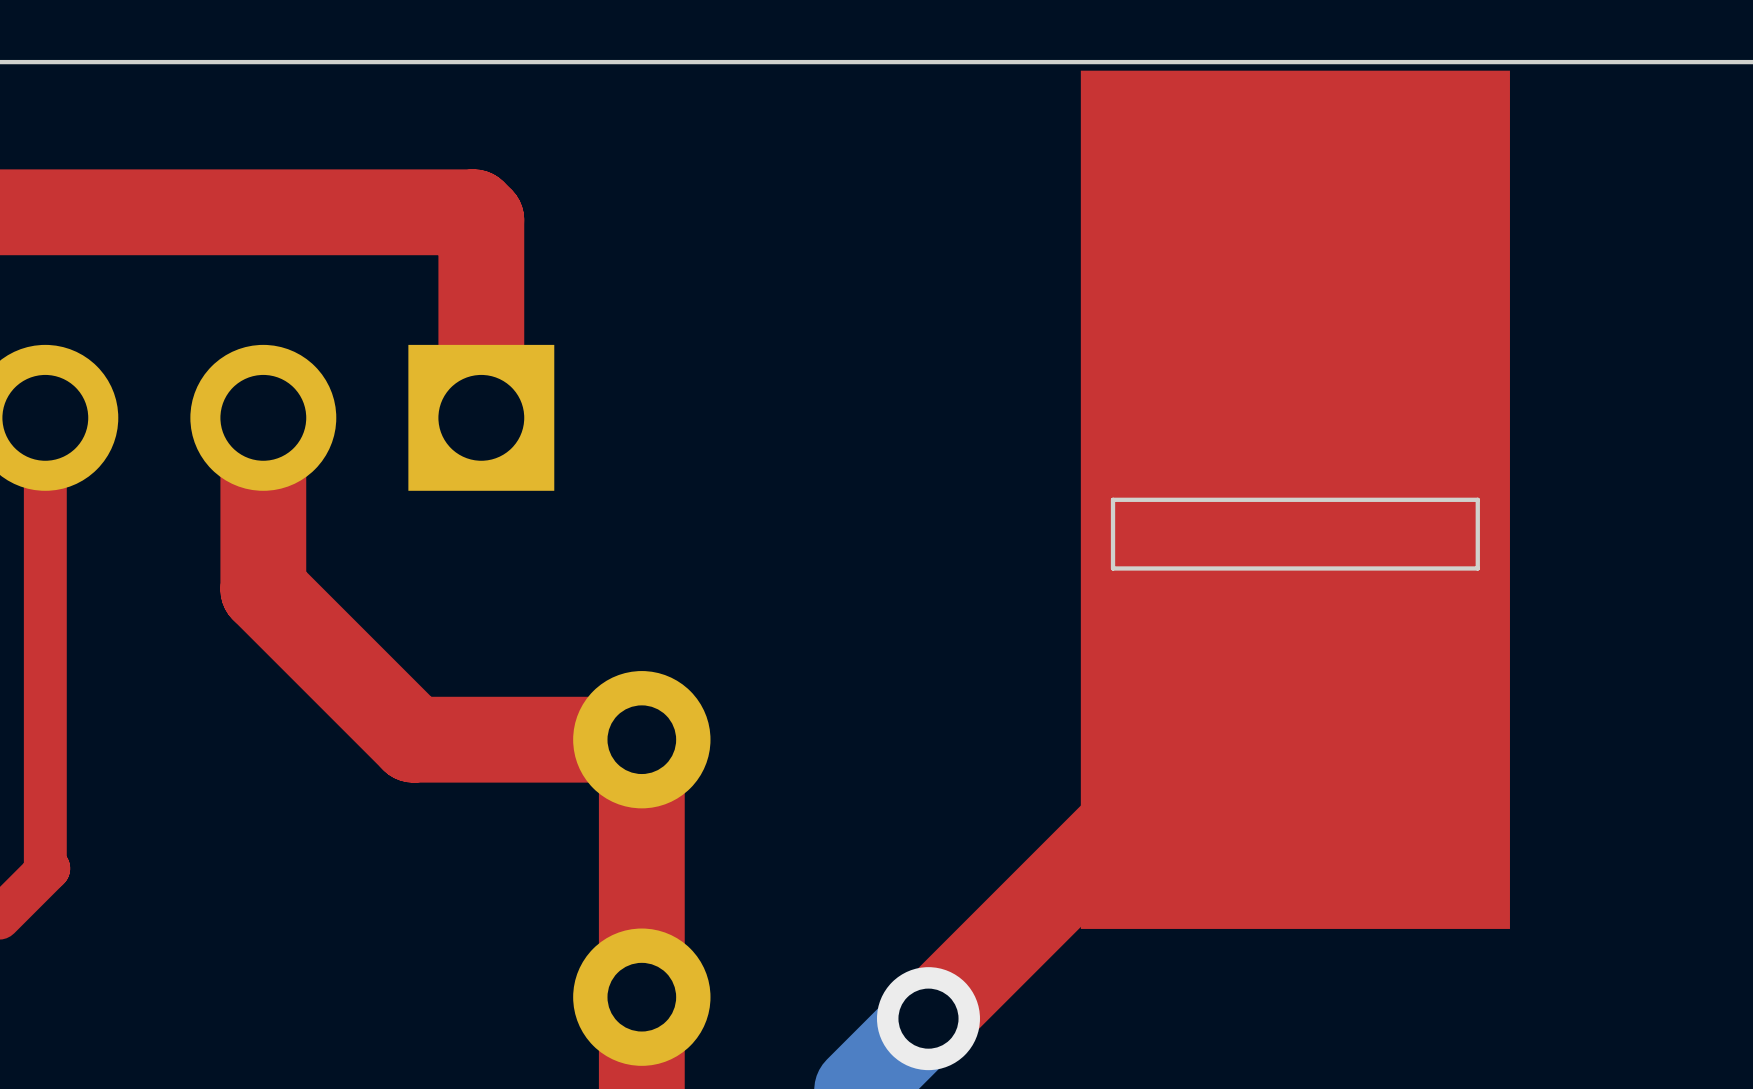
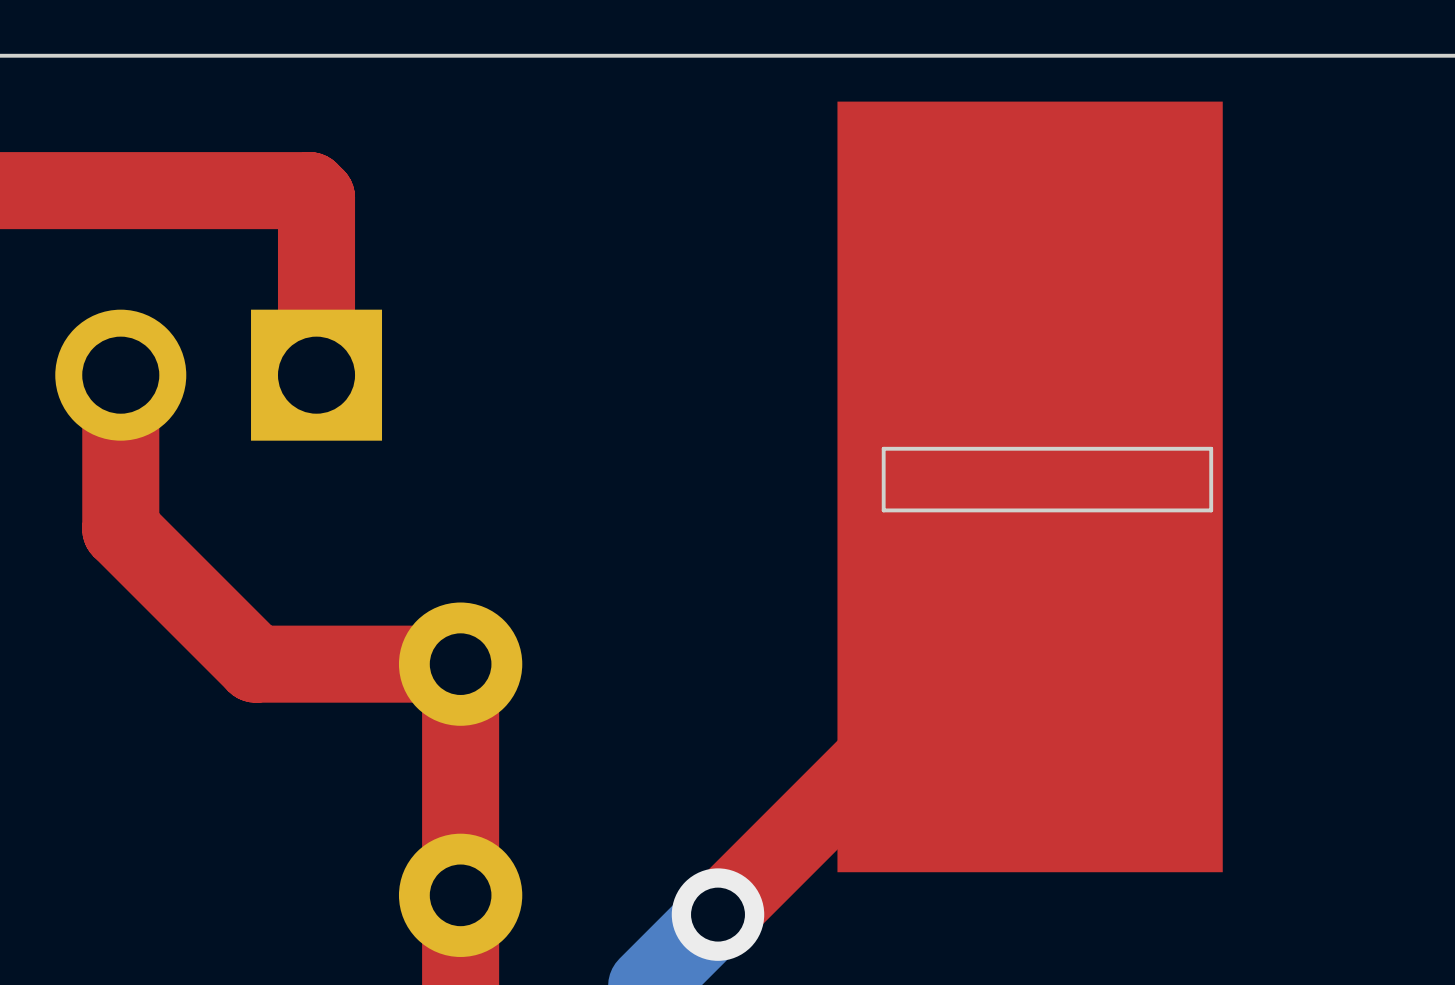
part position: (1295, 499) -> (1030, 486)

